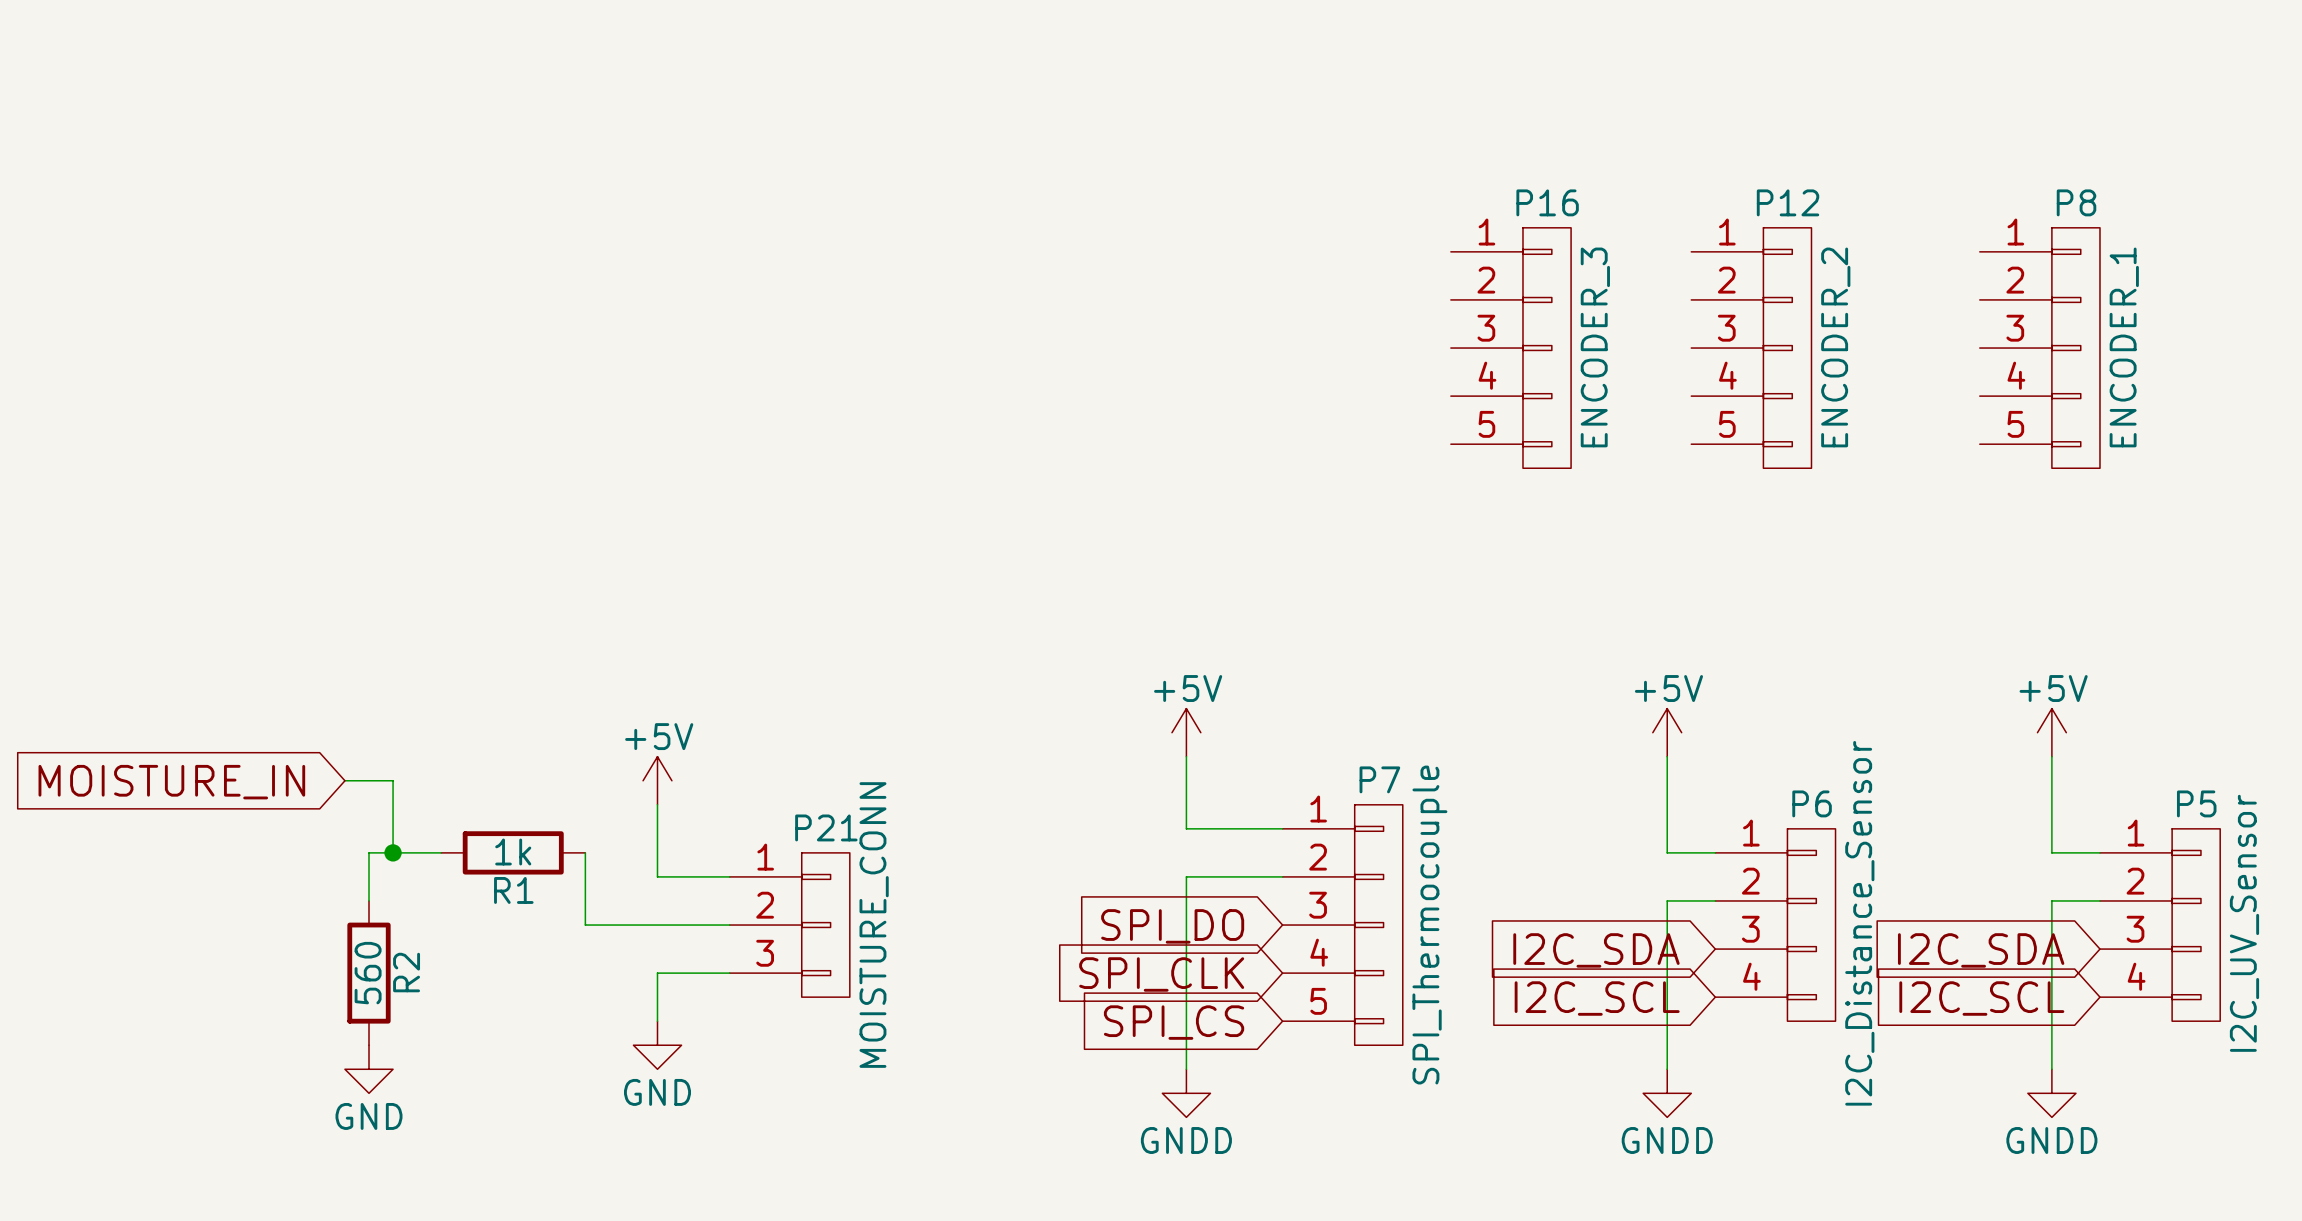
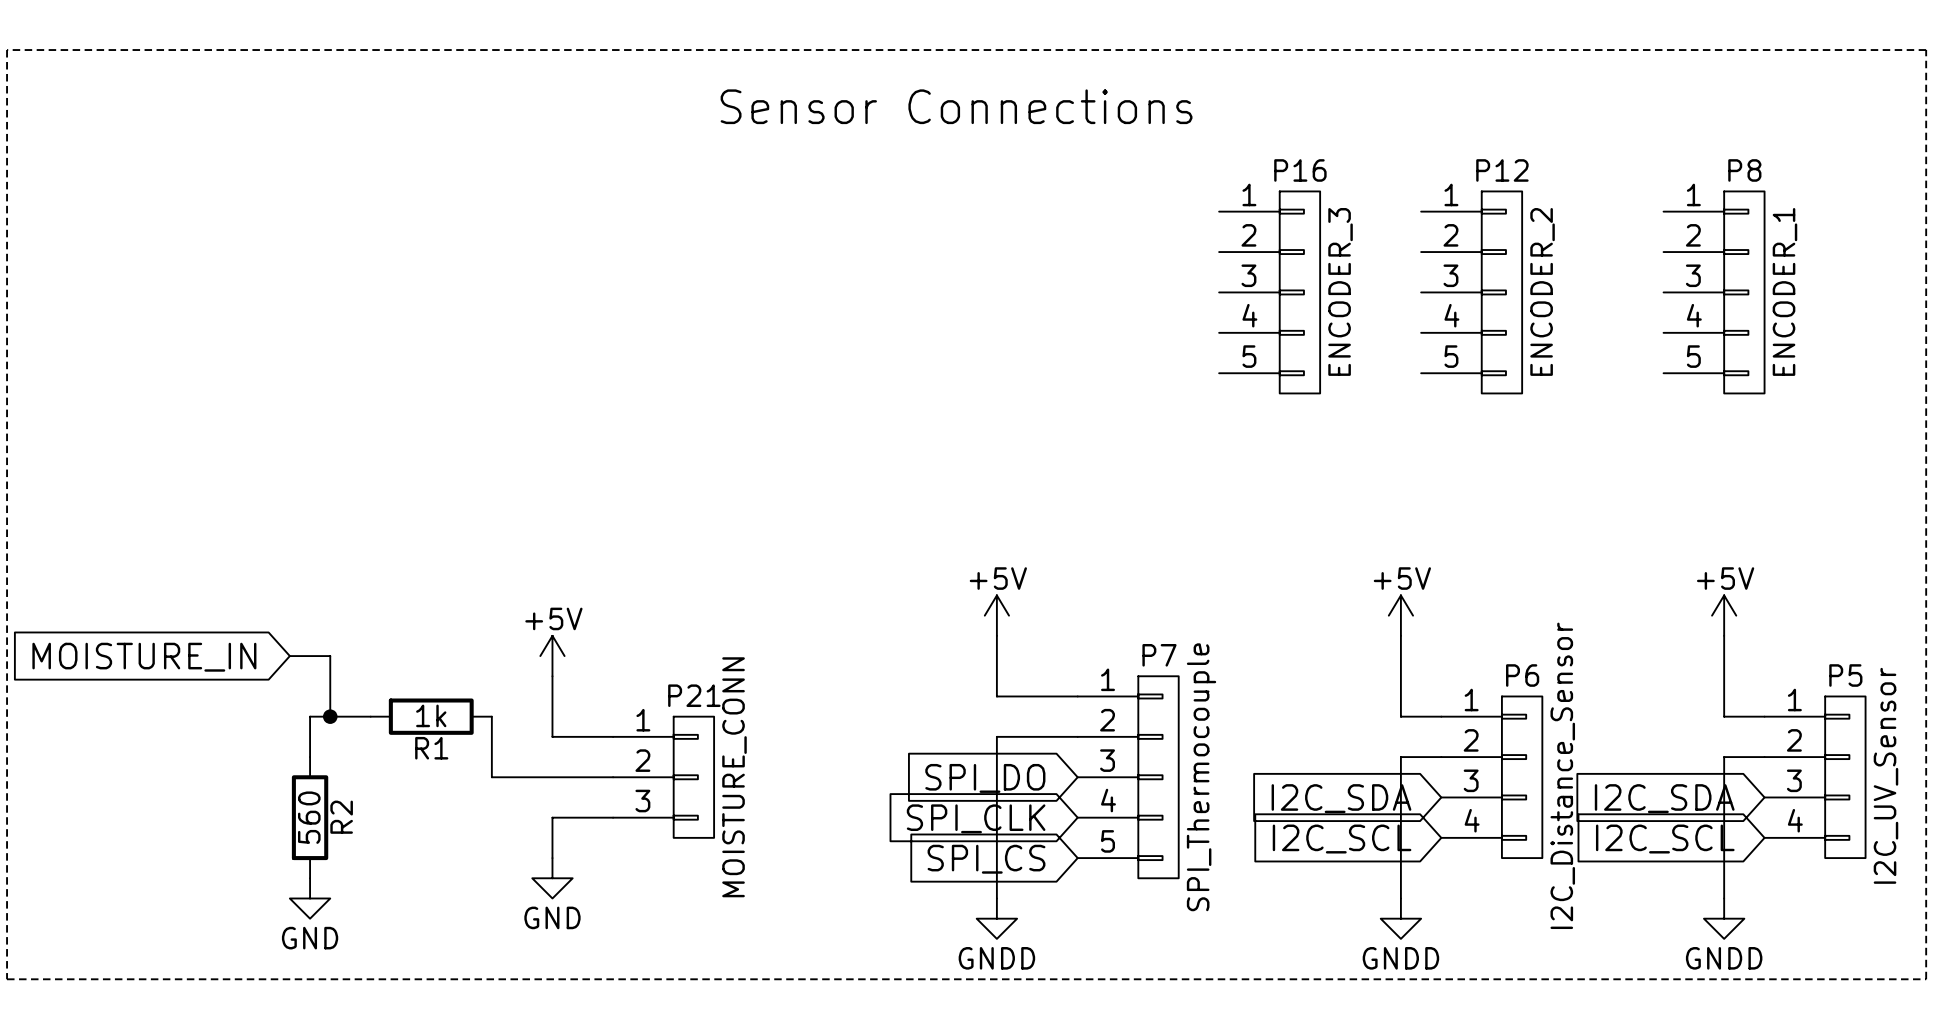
line: none -> (7, 50) (1926, 50) (1926, 979) (7, 979) (7, 50)
text: none -> Sensor Connections (956, 106)

